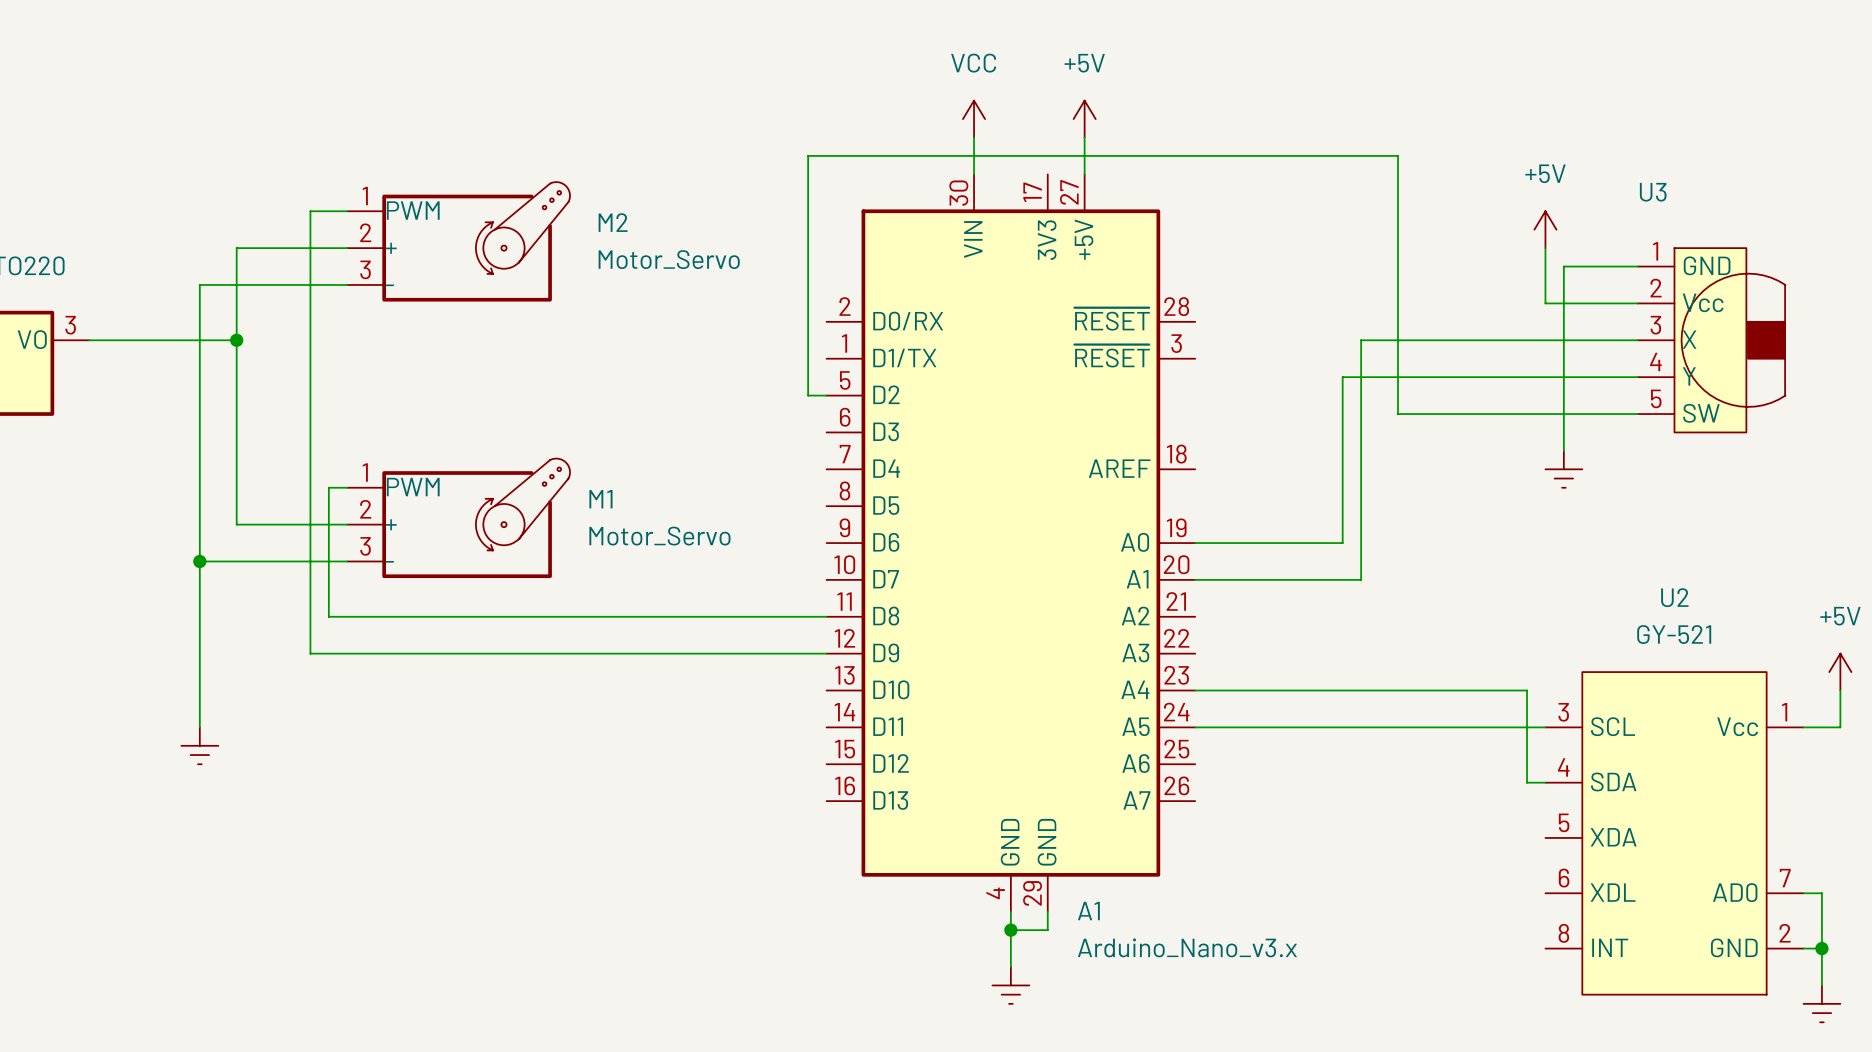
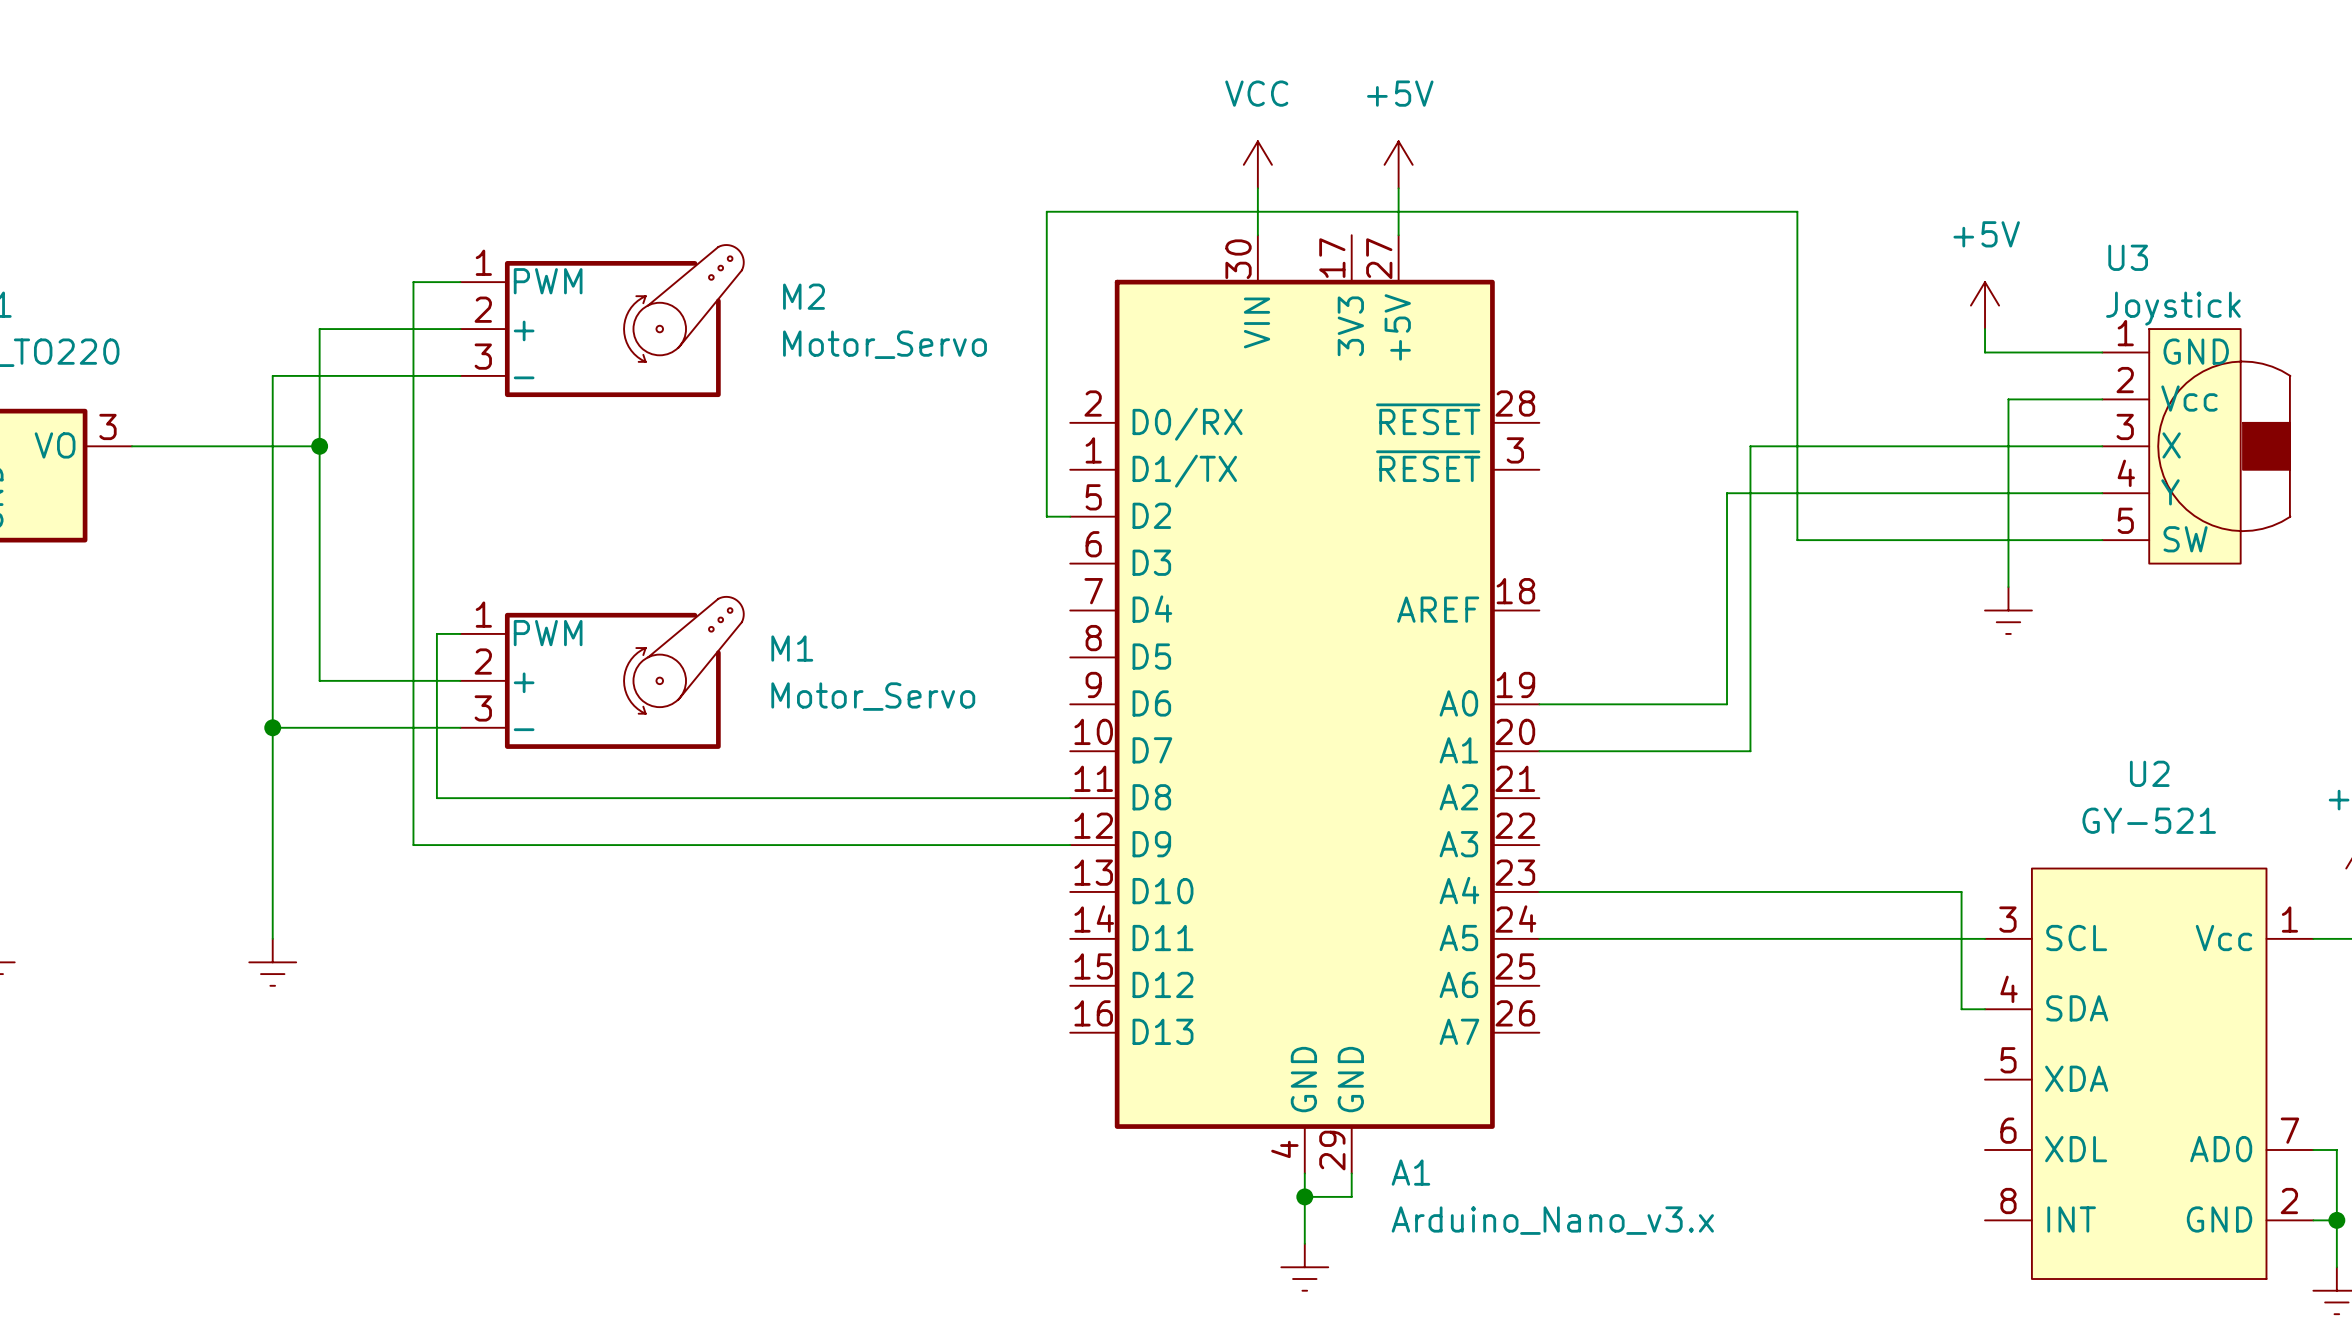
U3 value: none -> Joystick (2173, 308)
wire: (1545, 266) (1545, 303) (1563, 303) (1563, 266) -> (1985, 352) (2008, 352)

